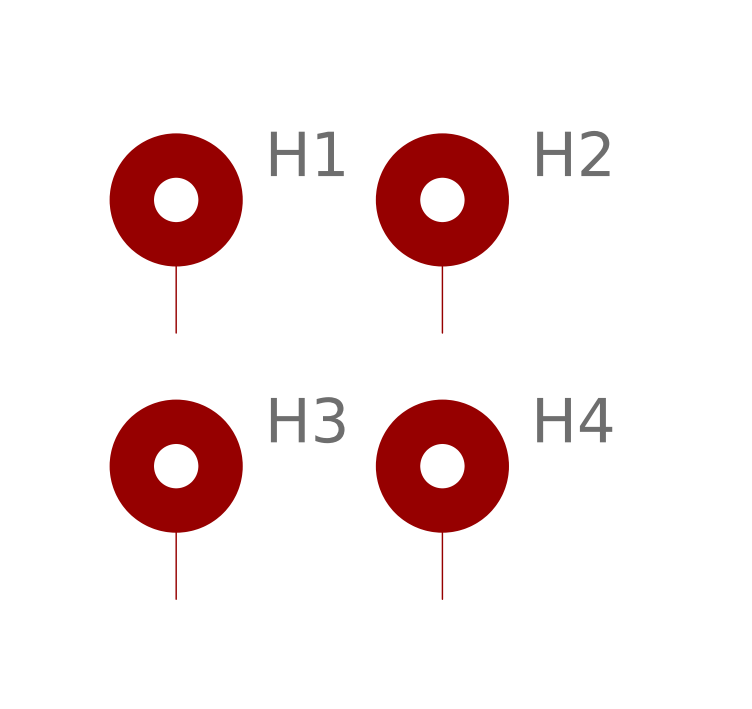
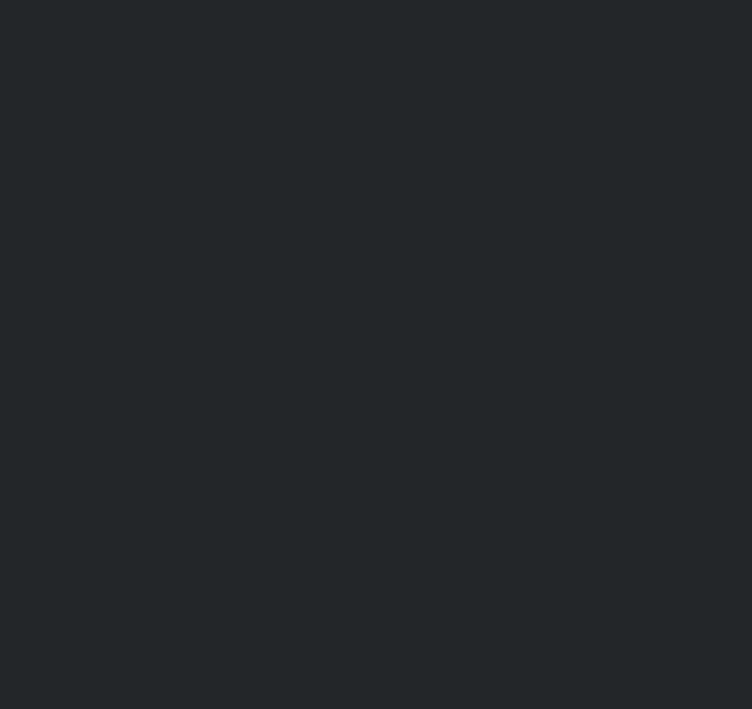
H1: (176, 233) -> none
H2: (442, 233) -> none
H3: (176, 499) -> none
H4: (442, 499) -> none

